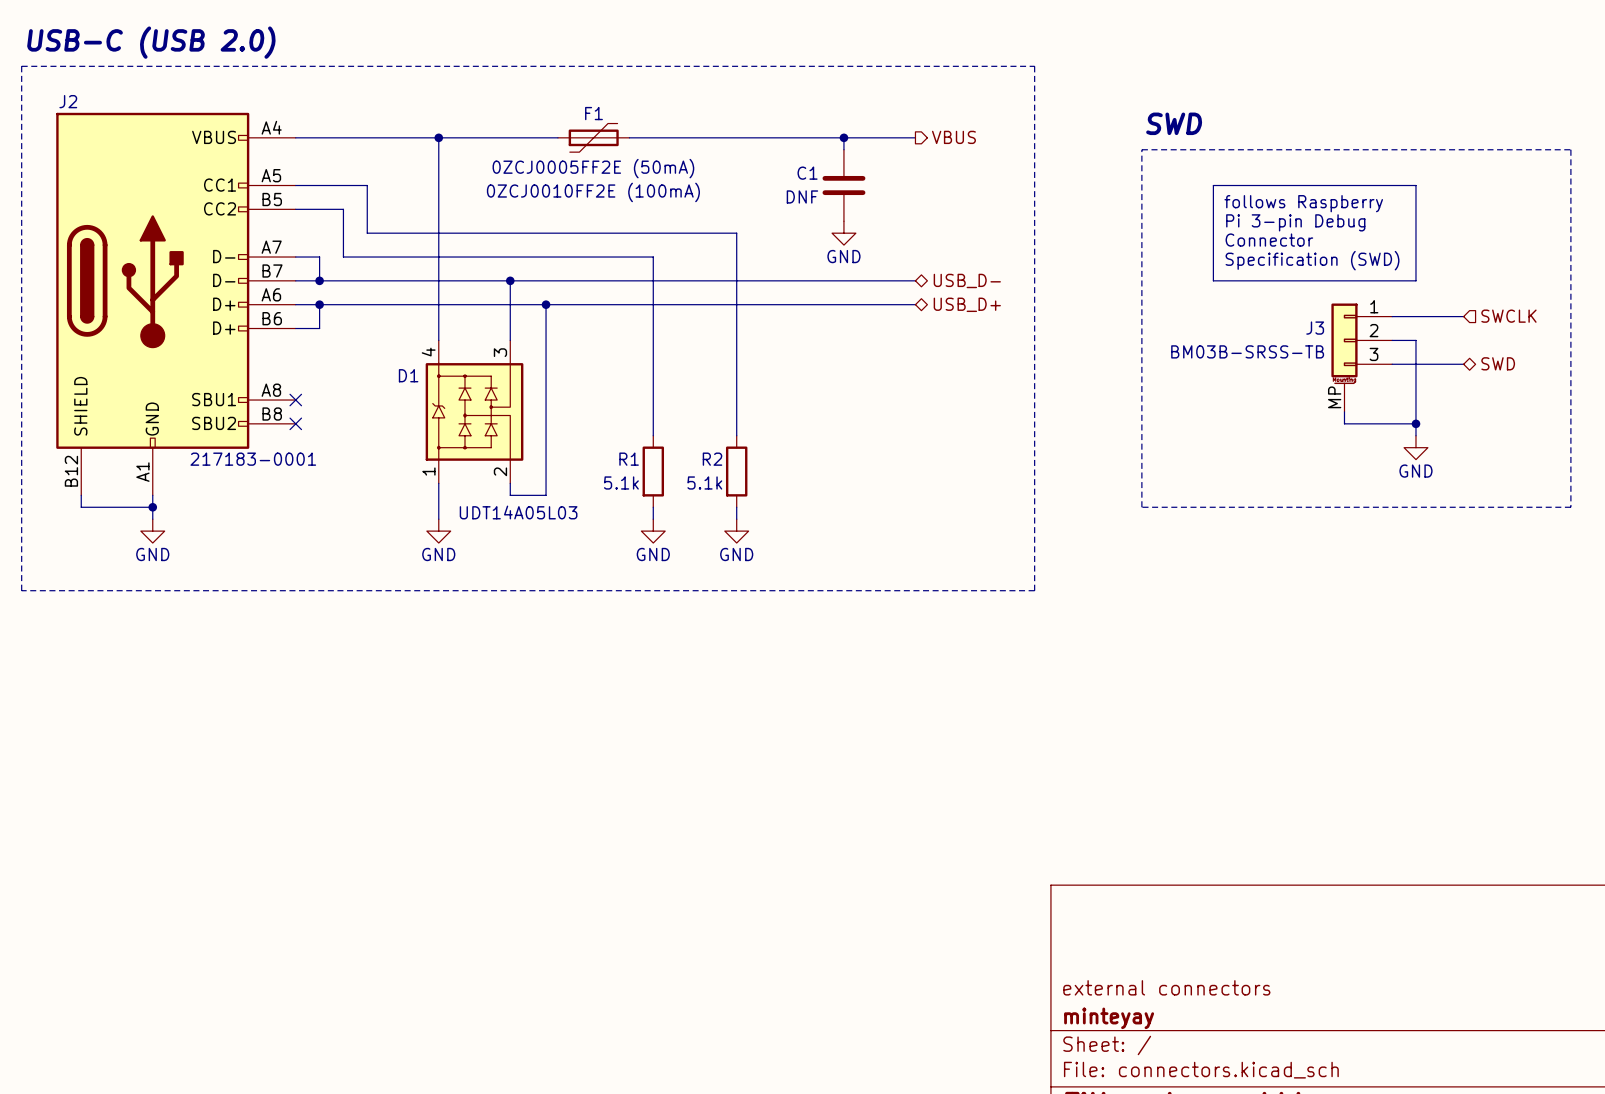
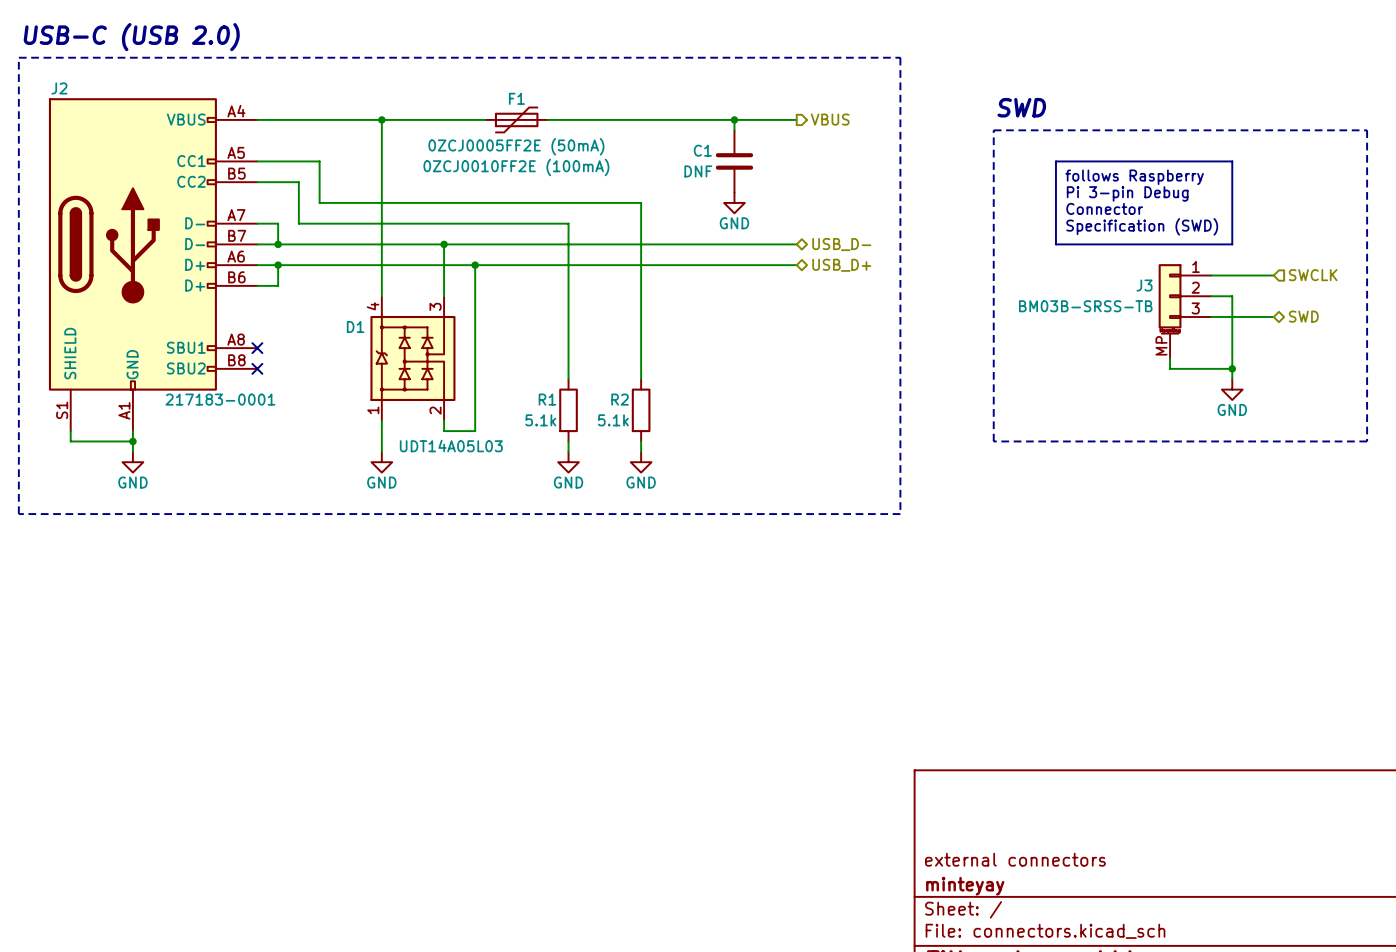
J2 pin number: B12 (71, 471) -> S1 (62, 410)

